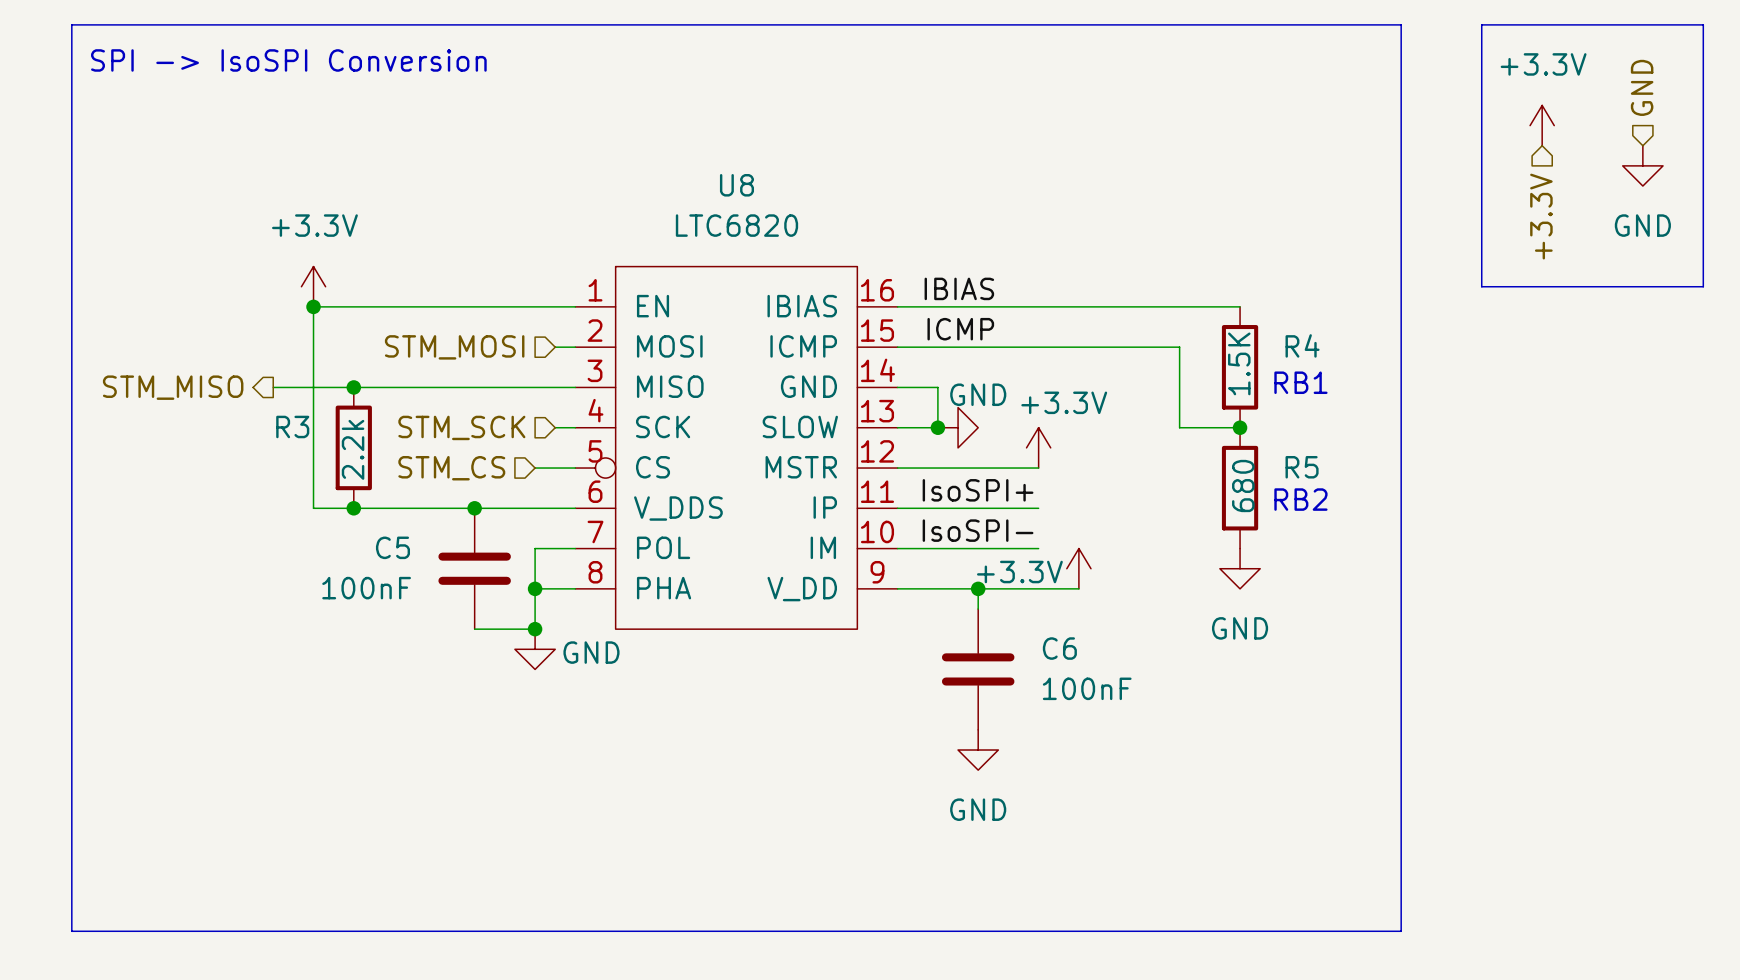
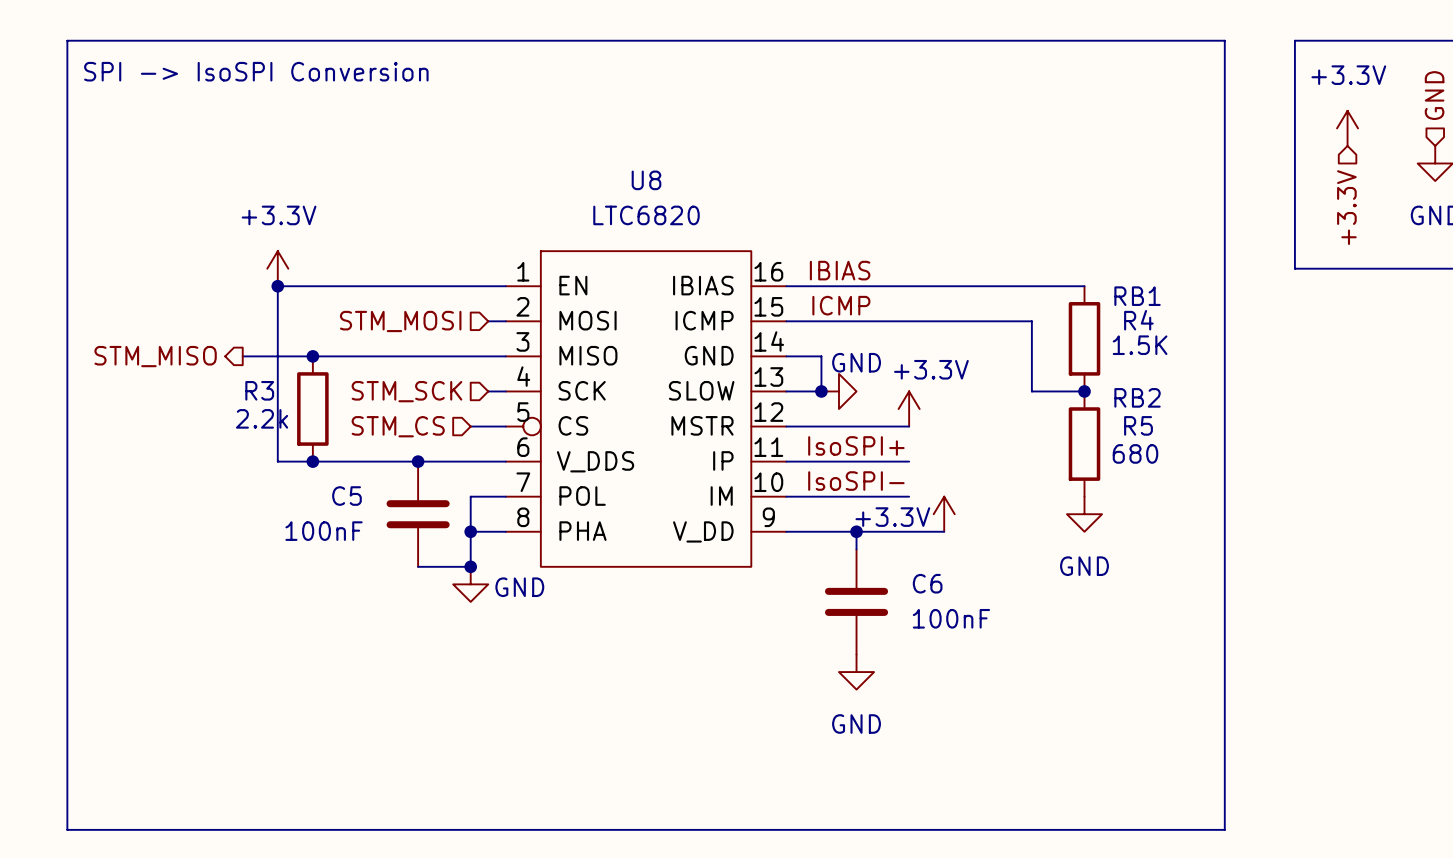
R4 value rotation: 0° (1239, 363) -> 90° clockwise (1140, 345)
text position: RB1 (1300, 382) -> RB1 (1137, 296)
R3 value rotation: 0° (353, 449) -> 90° clockwise (262, 418)
R5 value rotation: 0° (1243, 485) -> 90° clockwise (1135, 453)
text position: RB2 (1300, 499) -> RB2 (1137, 397)

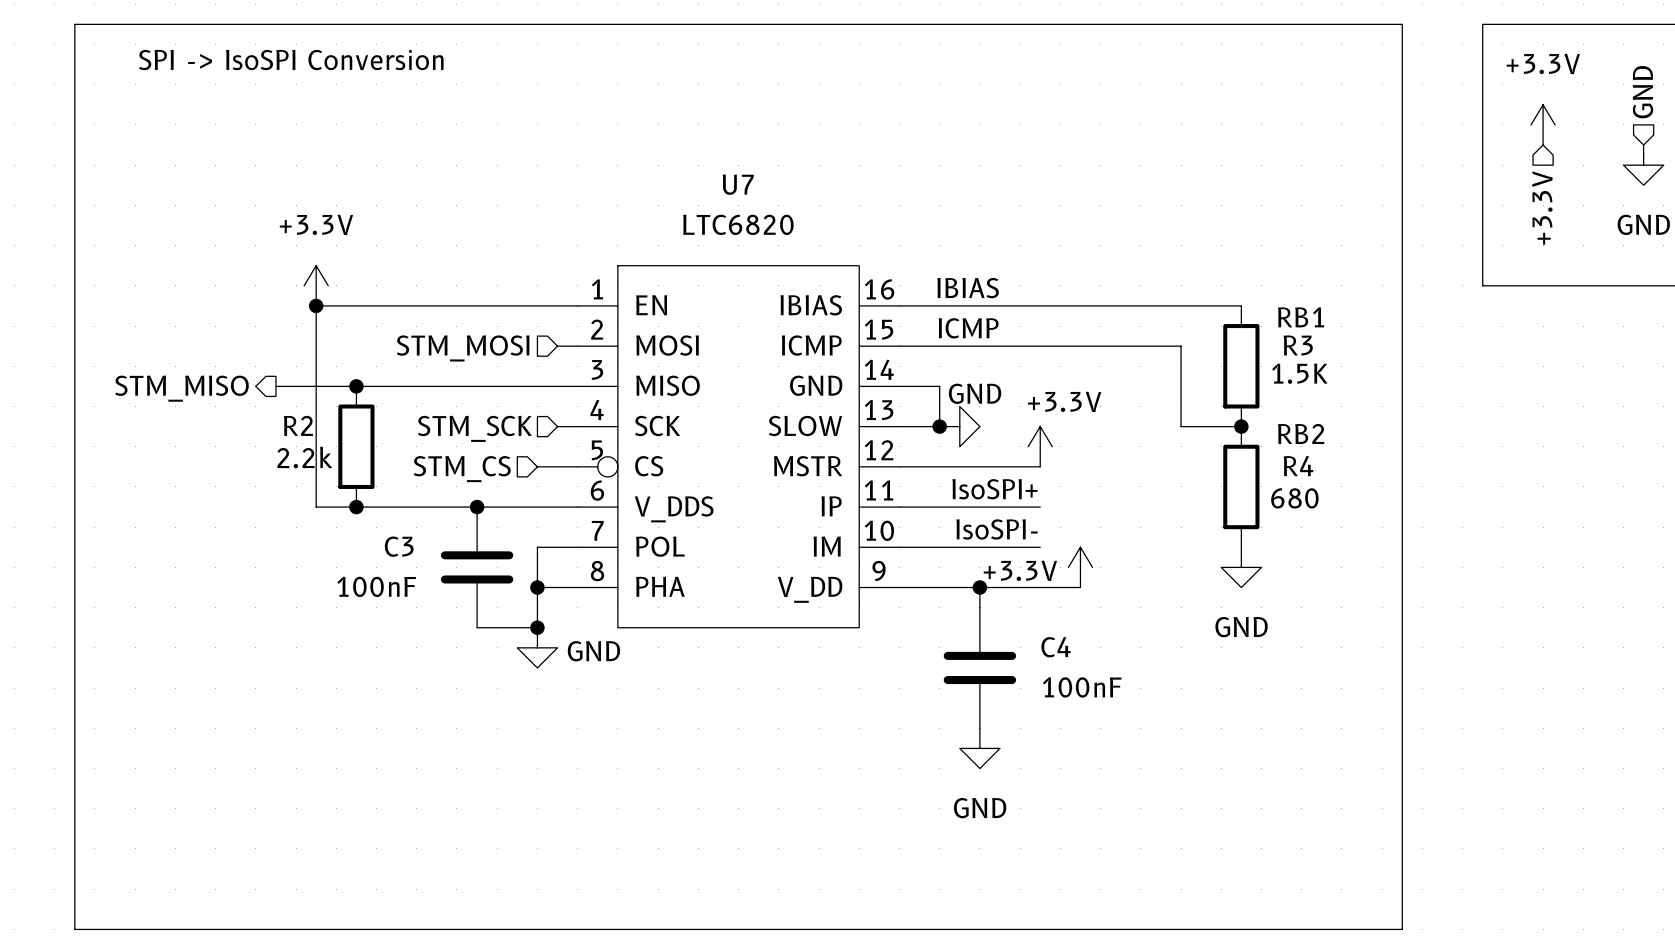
U8 name: U8 (646, 180) -> U7 (738, 184)
R4 name: R4 (1138, 320) -> R3 (1298, 345)
R3 name: R3 (259, 390) -> R2 (298, 425)
R5 name: R5 (1138, 425) -> R4 (1298, 466)
C5 name: C5 (346, 496) -> C3 (399, 546)
C6 name: C6 (927, 583) -> C4 (1056, 647)

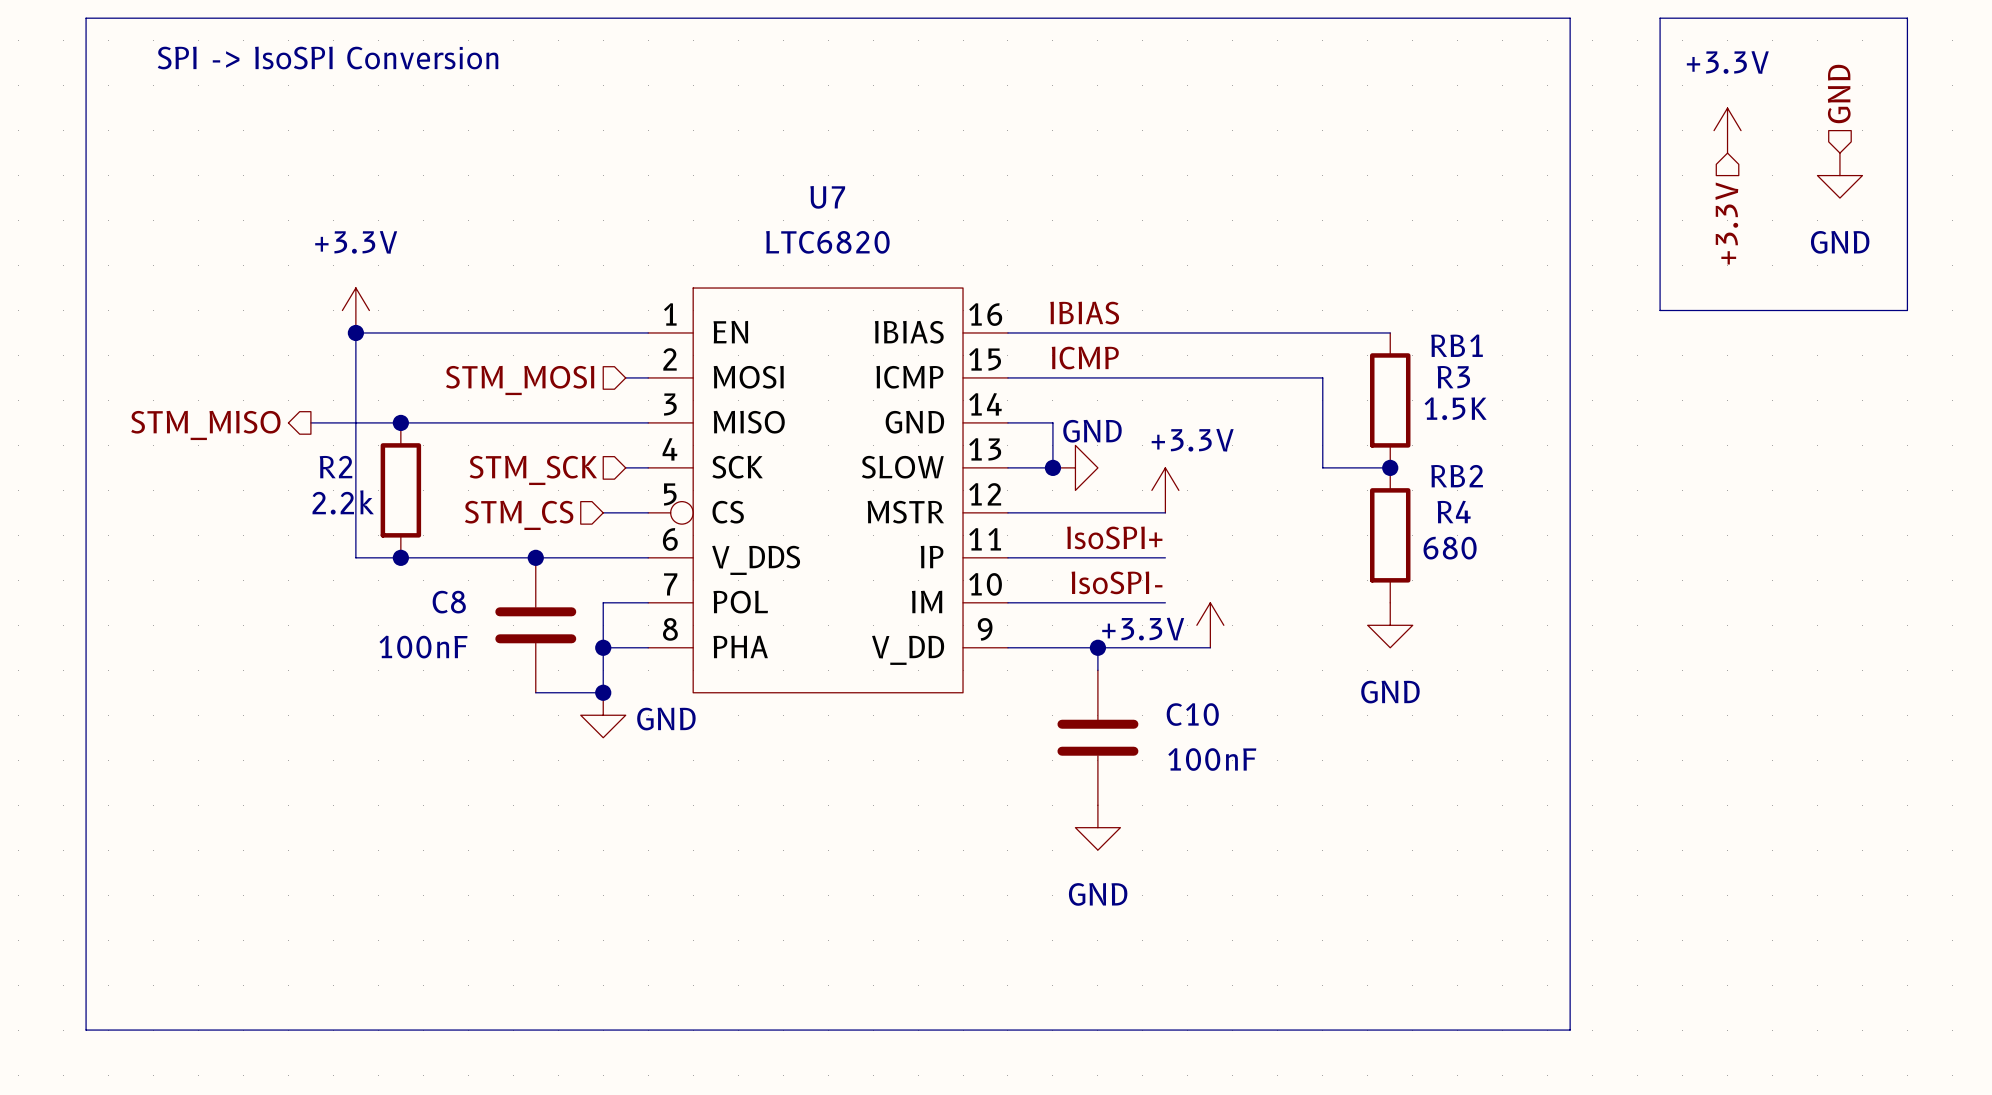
C3 name: C3 (399, 546) -> C8 (449, 602)
C4 name: C4 (1056, 647) -> C10 (1192, 714)

